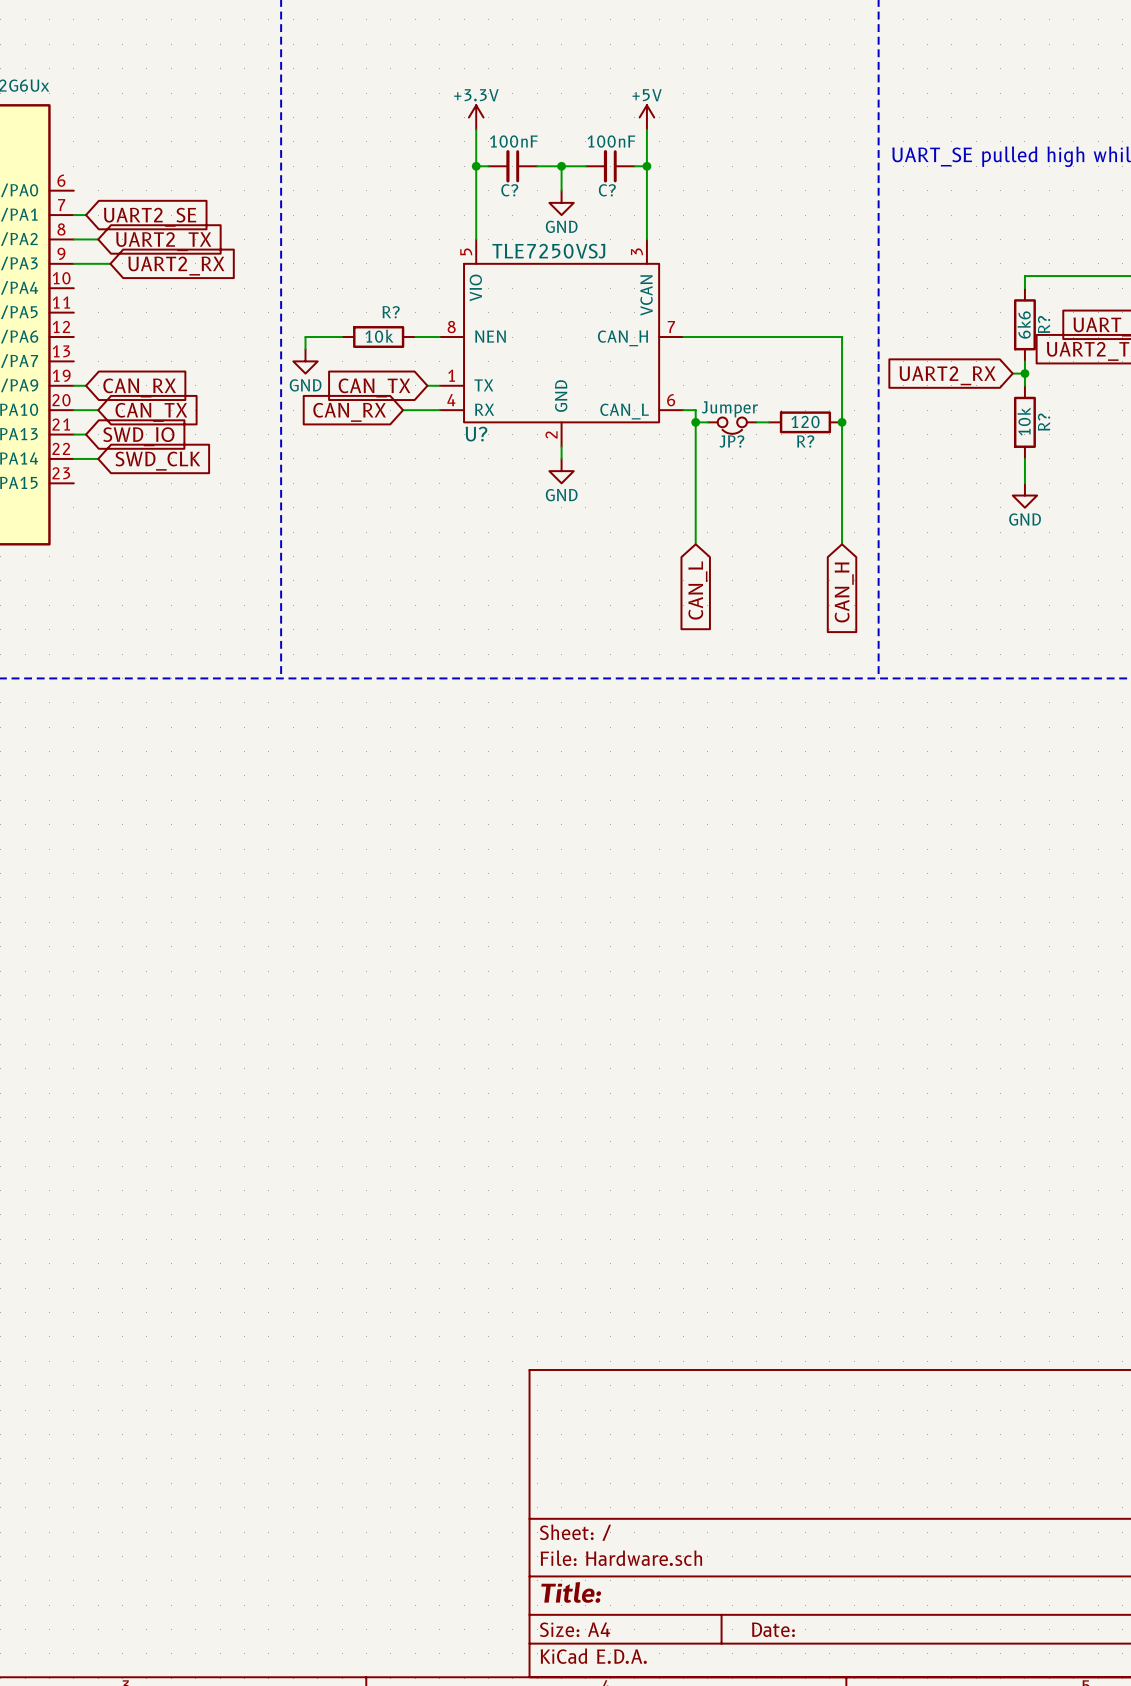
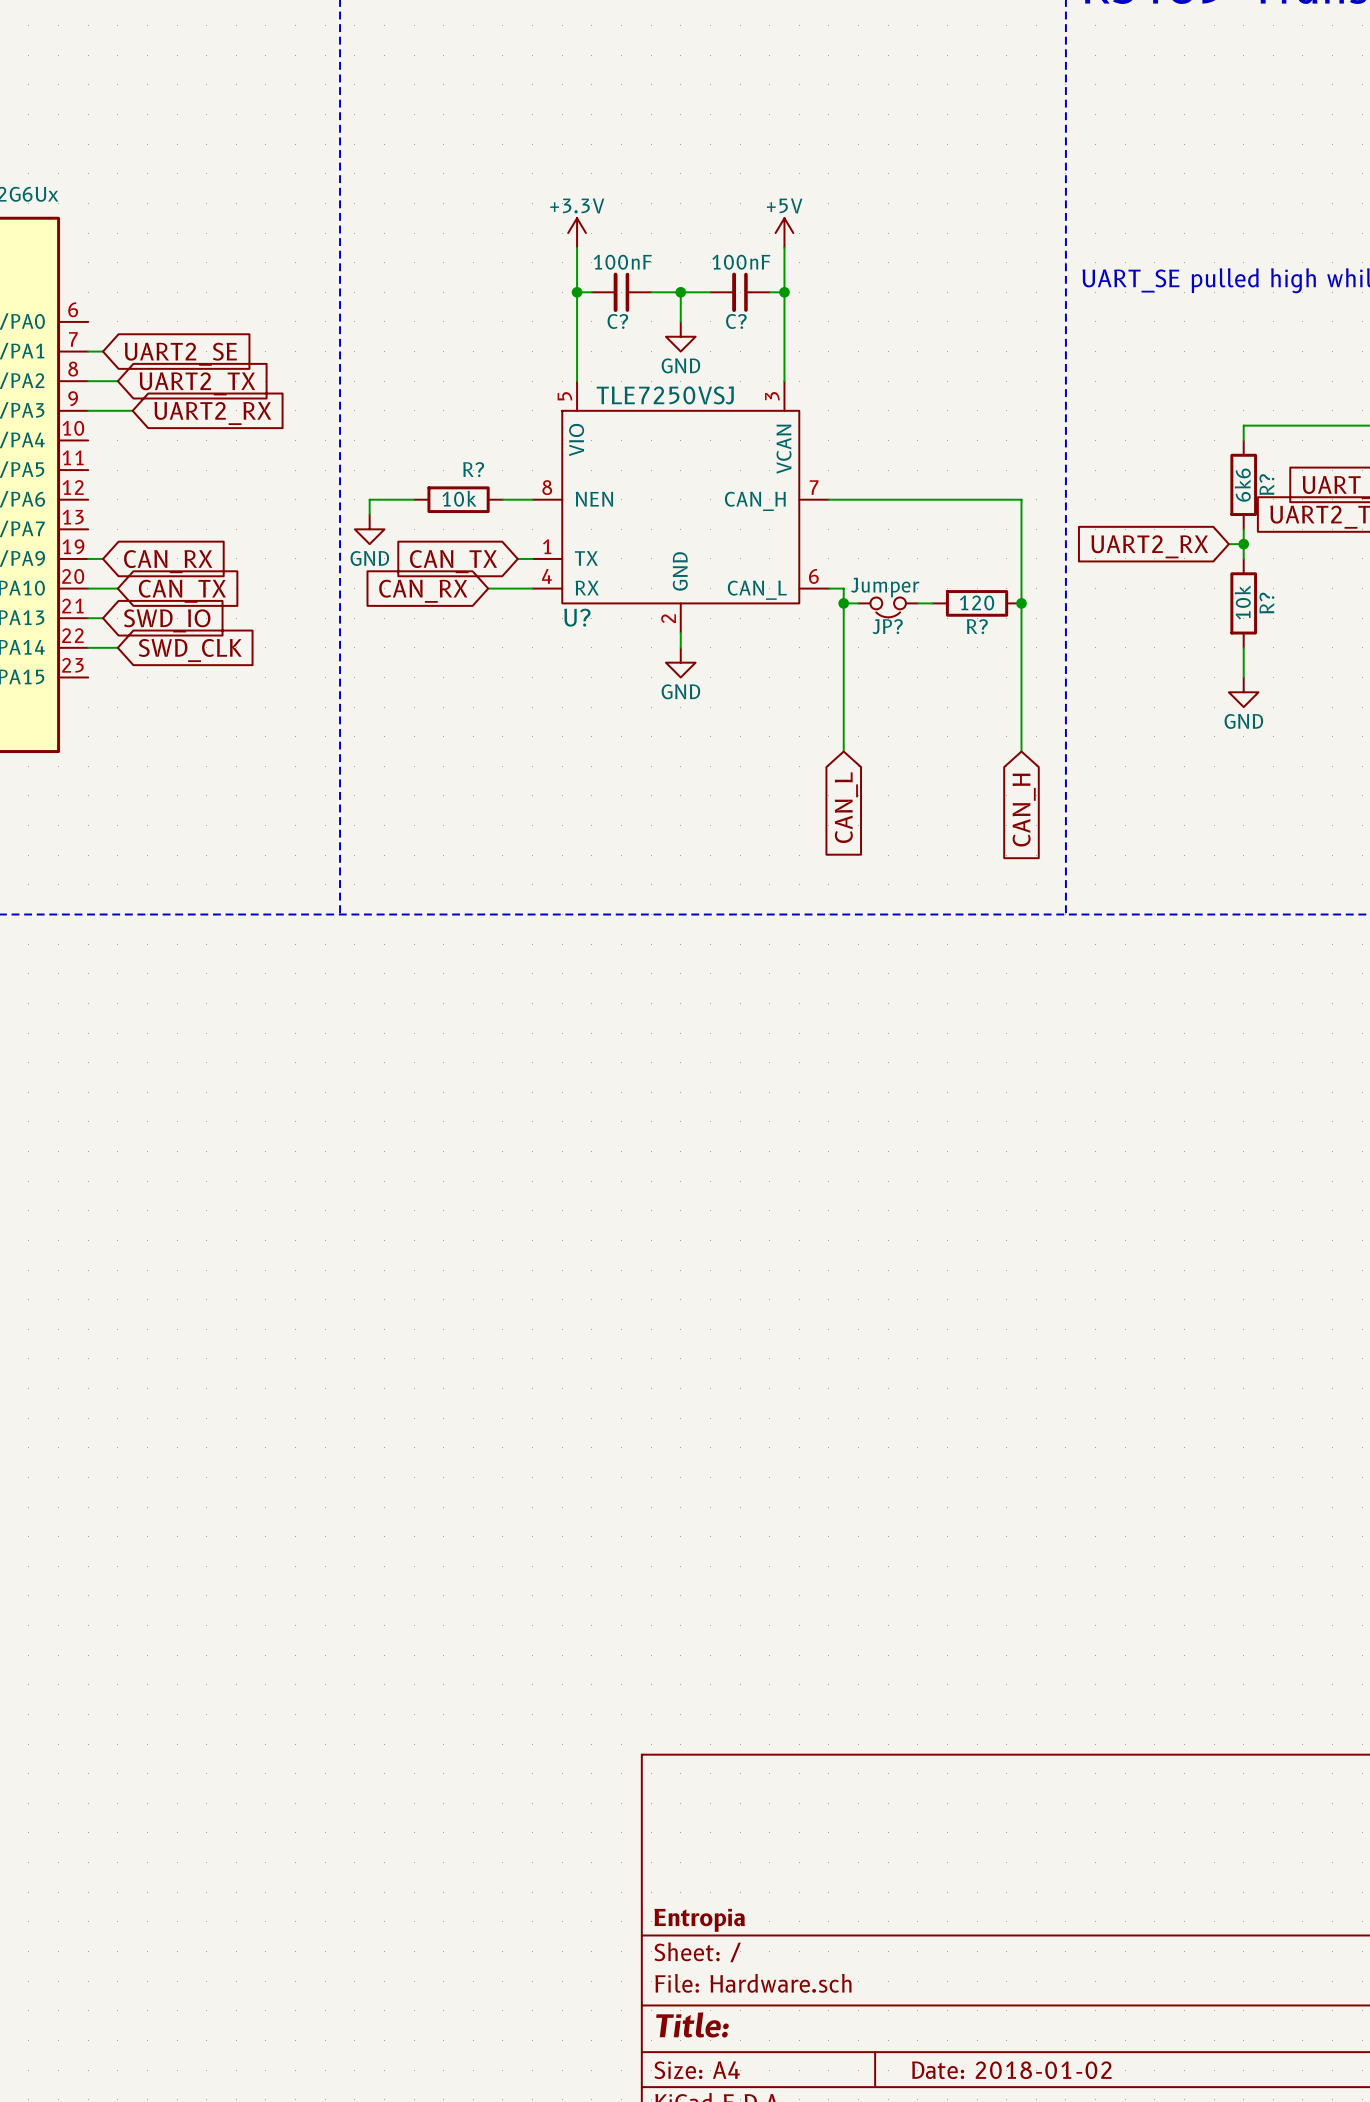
title block: none -> Entropia (699, 1920)
title block: Date: (773, 1629) -> Date: 2018-01-02 (1011, 2070)

